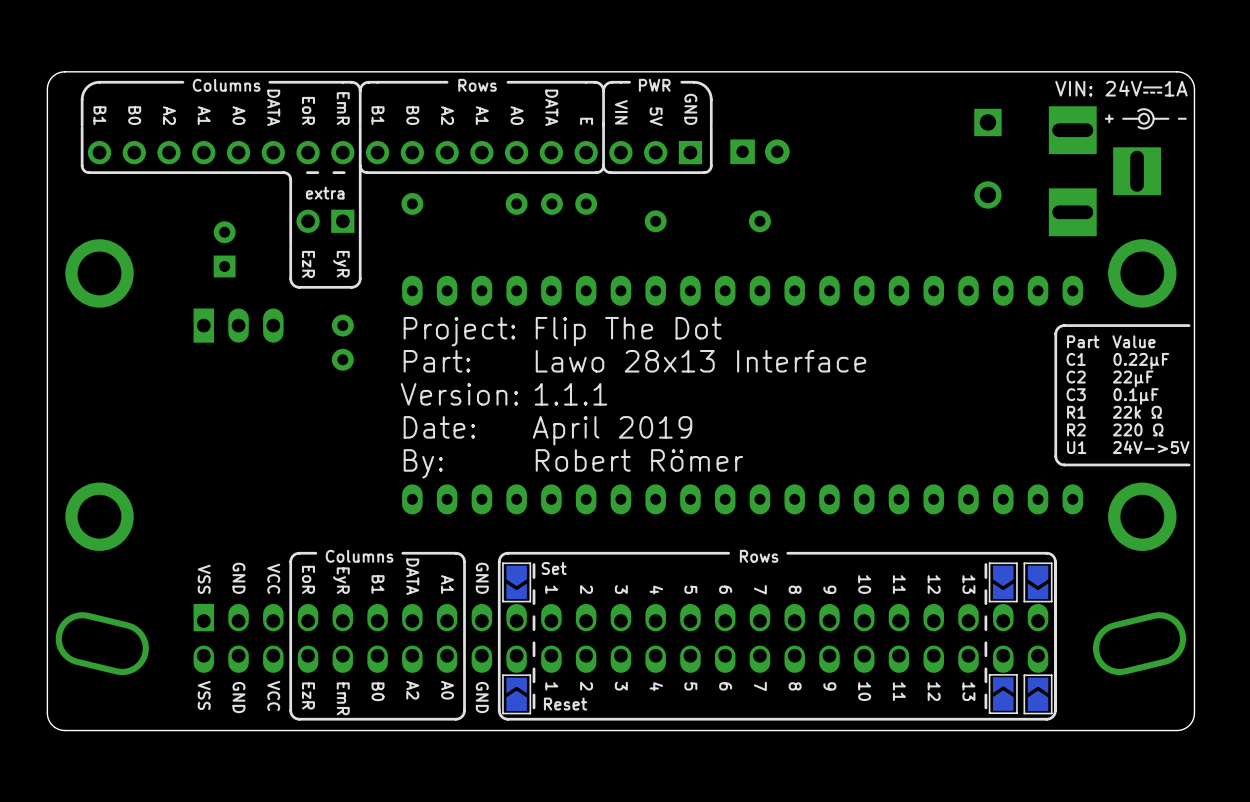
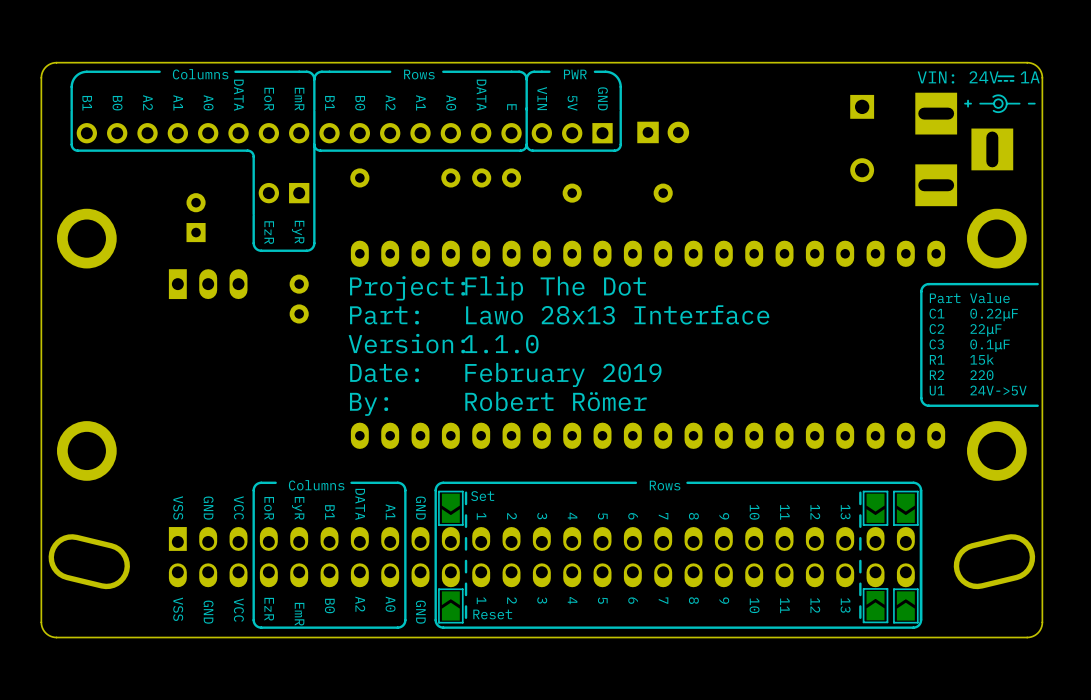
line: (317, 172) (307, 172) -> none
line: (344, 172) (333, 172) -> none
text: extra (325, 193) -> none
text: 1.1.1 (570, 394) -> 1.1.0 (501, 344)
text: 22k Ω (1137, 412) -> 15k (982, 359)
text: 220 Ω (1138, 429) -> 220 (981, 375)
text: April 2019 (612, 430) -> February 2019 (563, 374)

